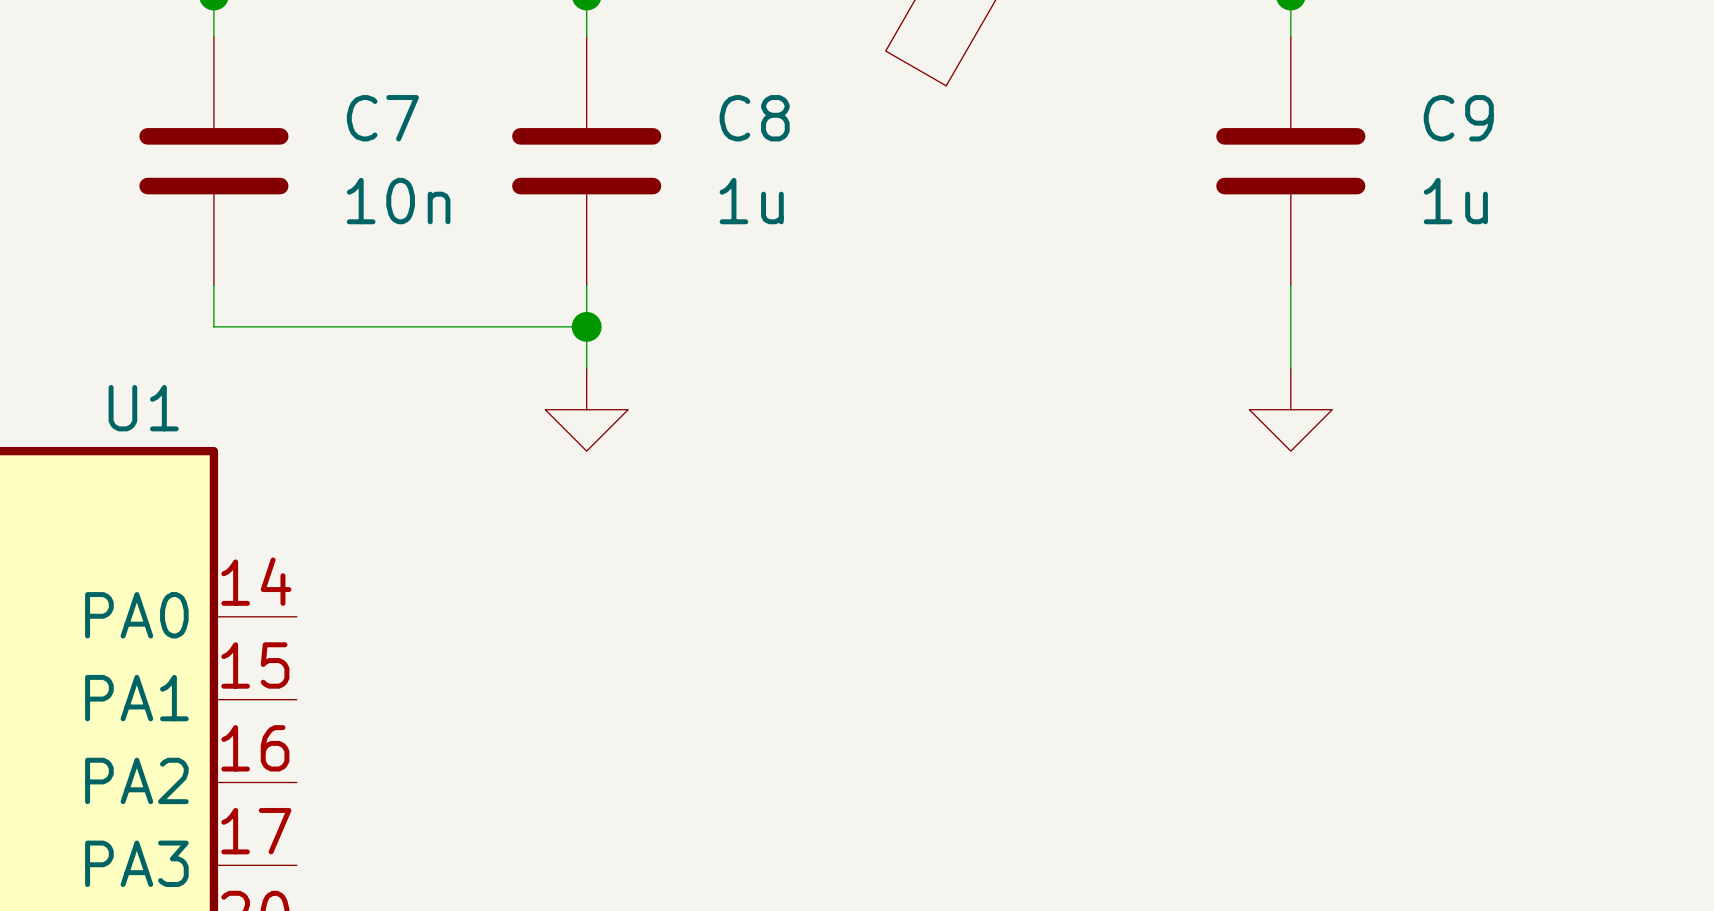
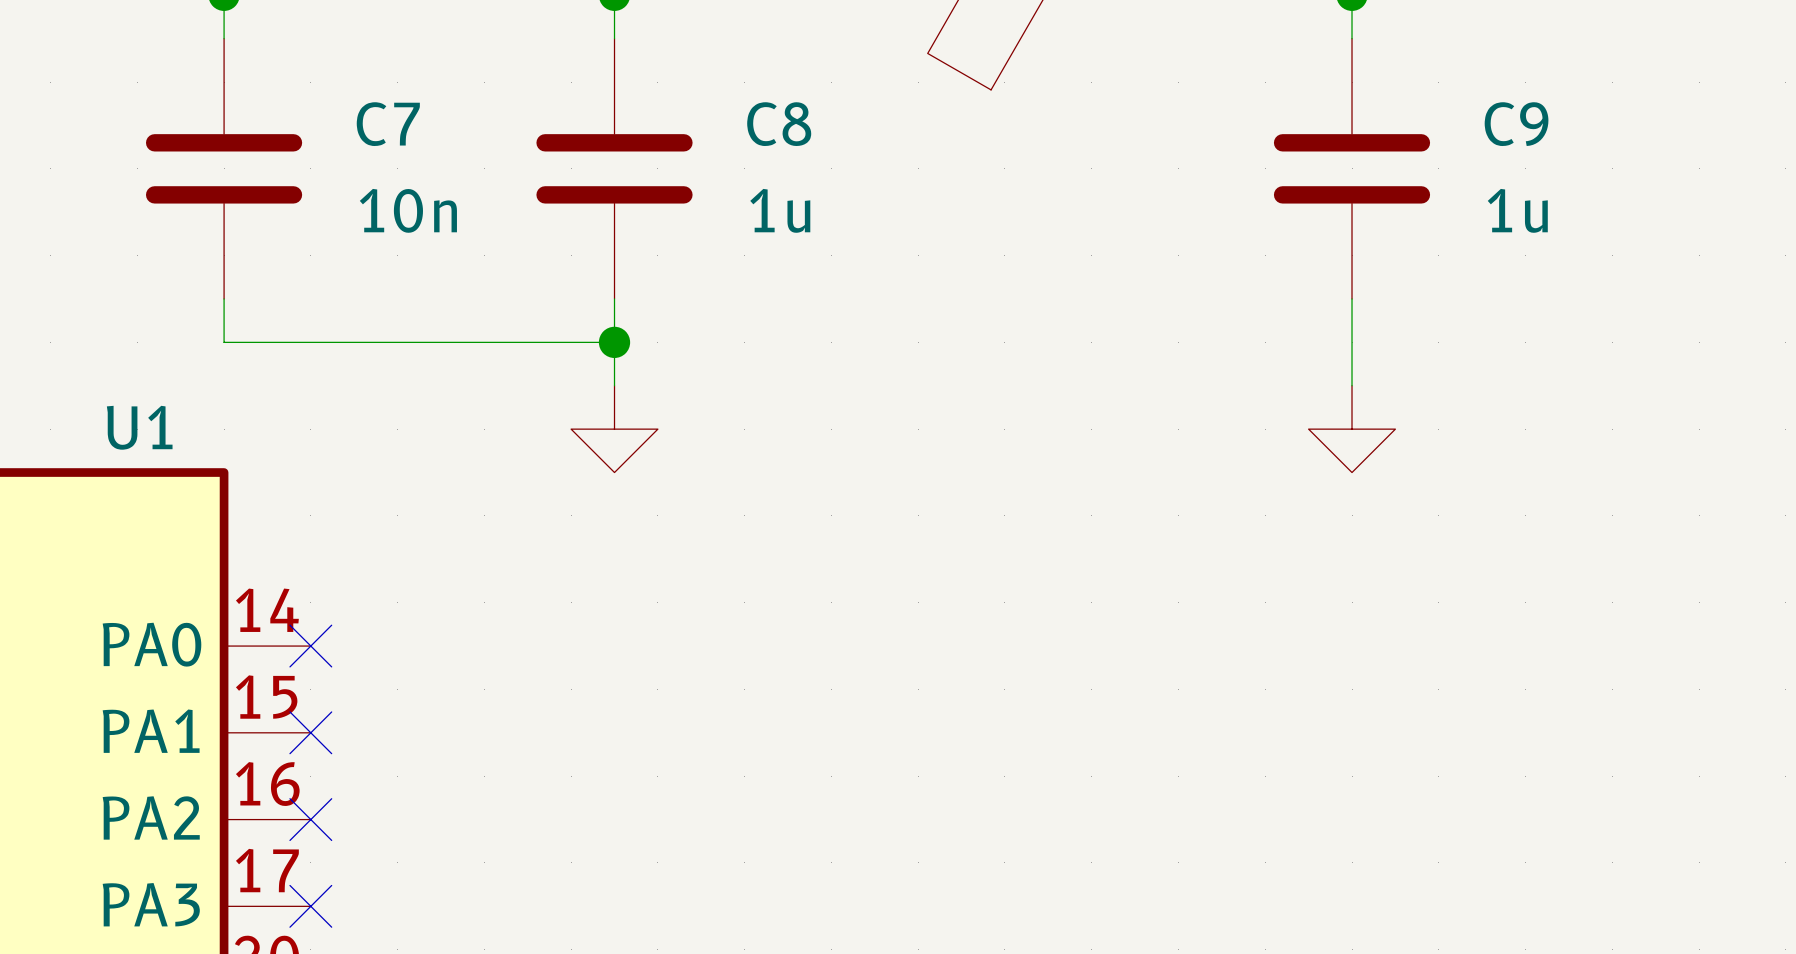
no-connect mark: none -> (310, 646)
no-connect mark: none -> (310, 732)
no-connect mark: none -> (310, 819)
no-connect mark: none -> (310, 906)

